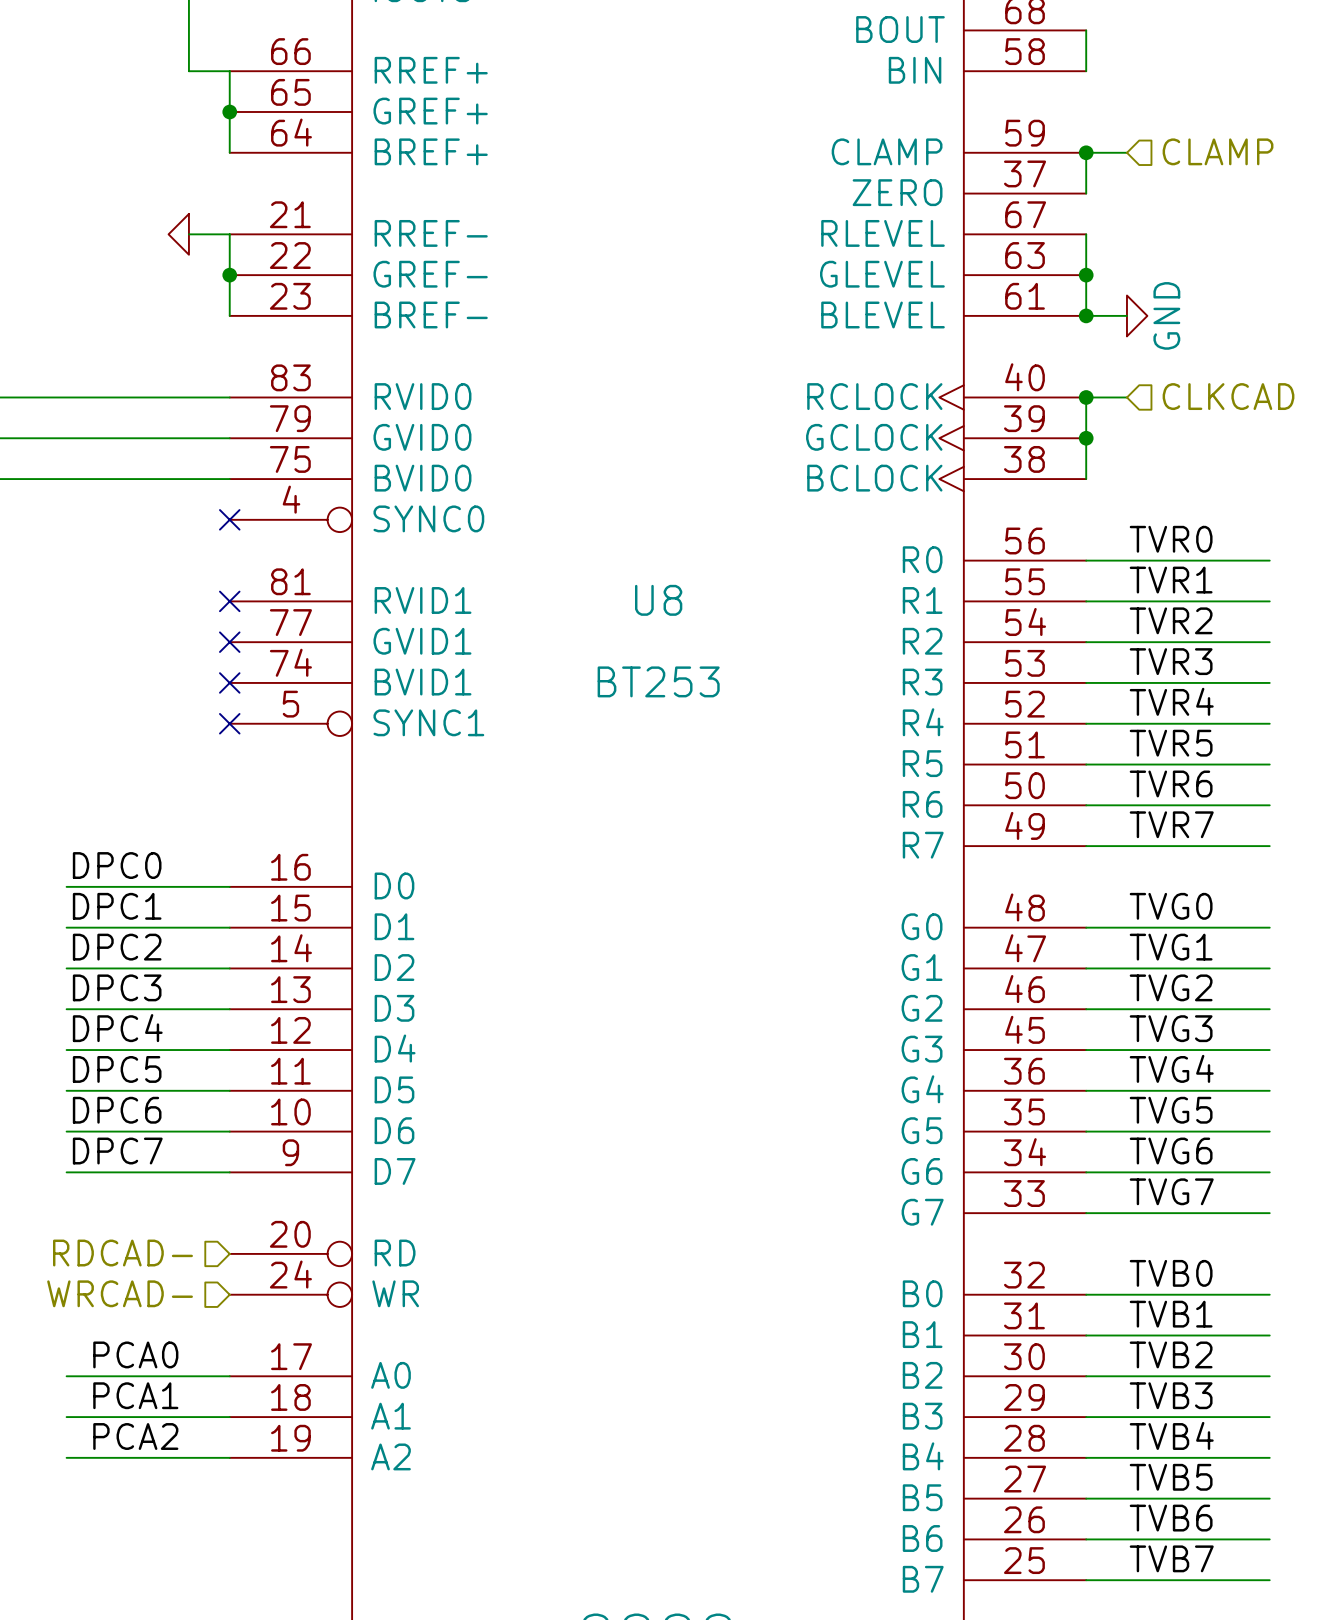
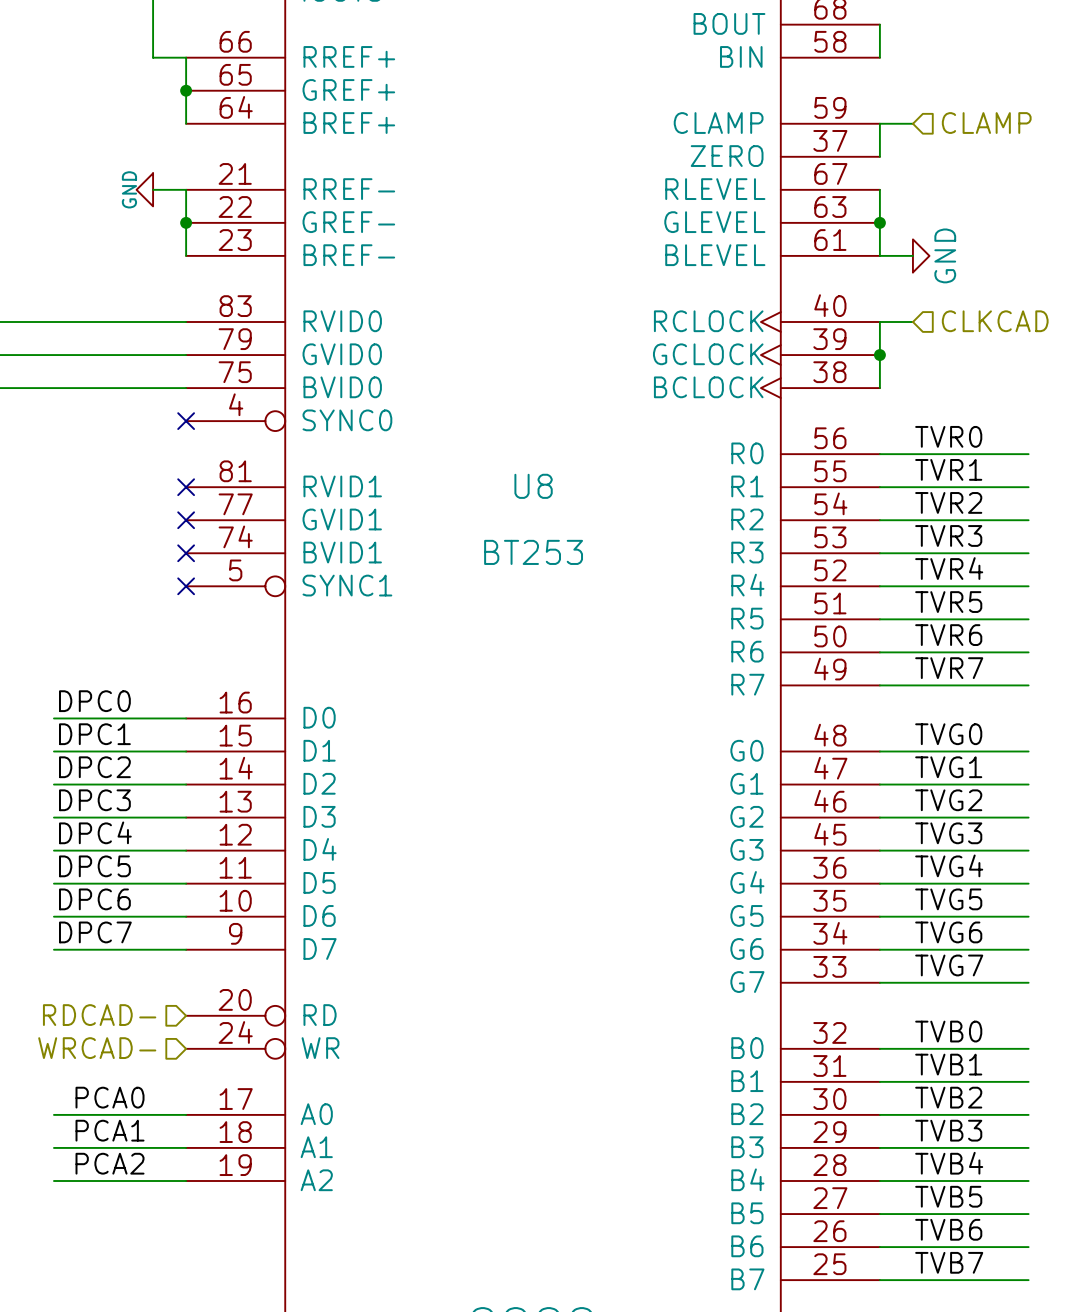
junction: (1086, 152) -> none
power symbol text: none -> GND (129, 189)
junction: (1086, 315) -> none
junction: (1086, 397) -> none

